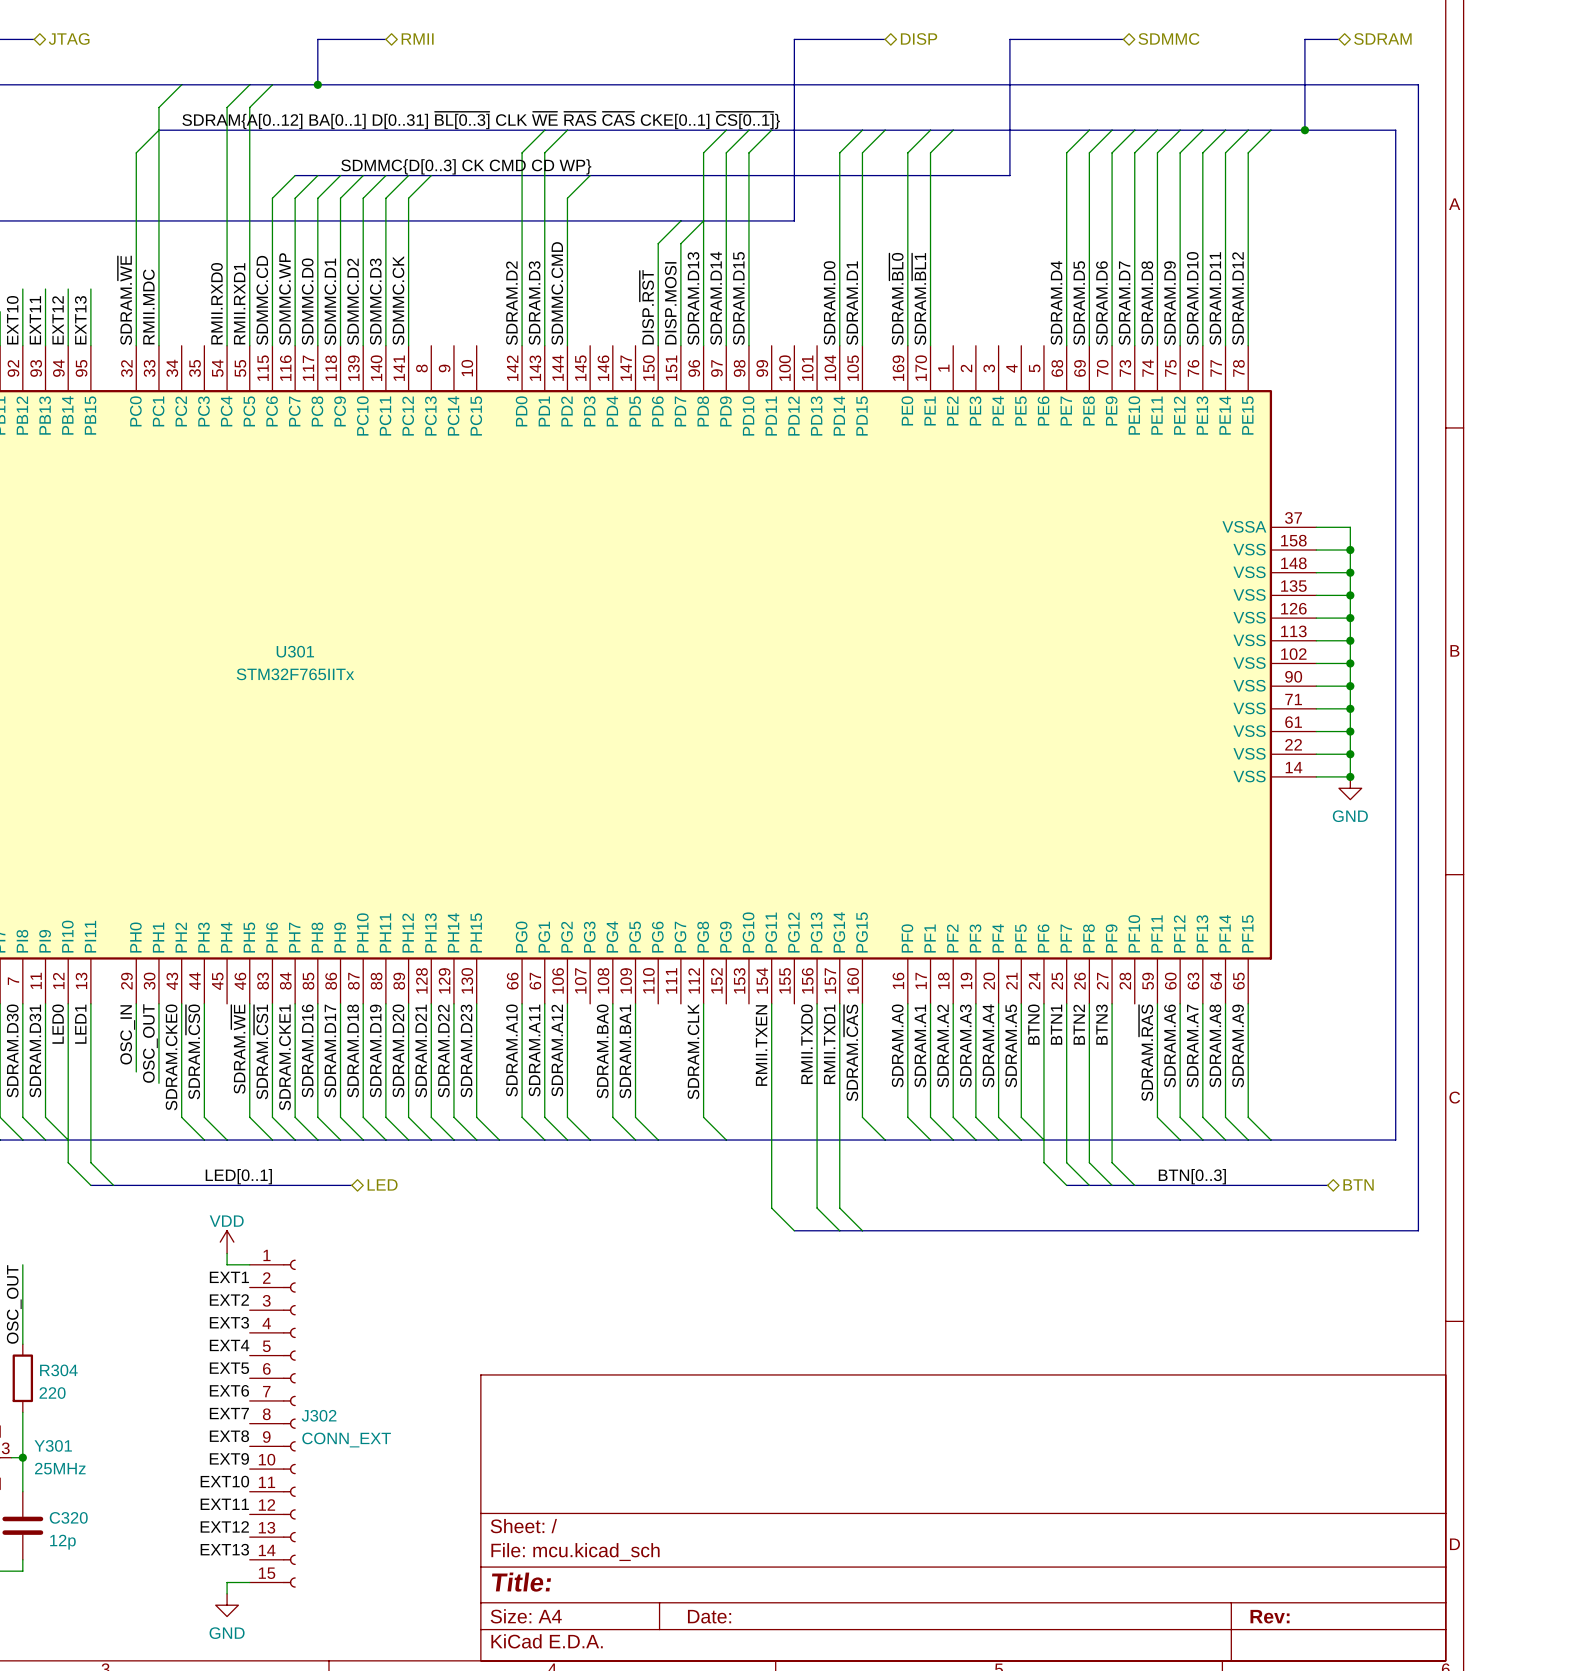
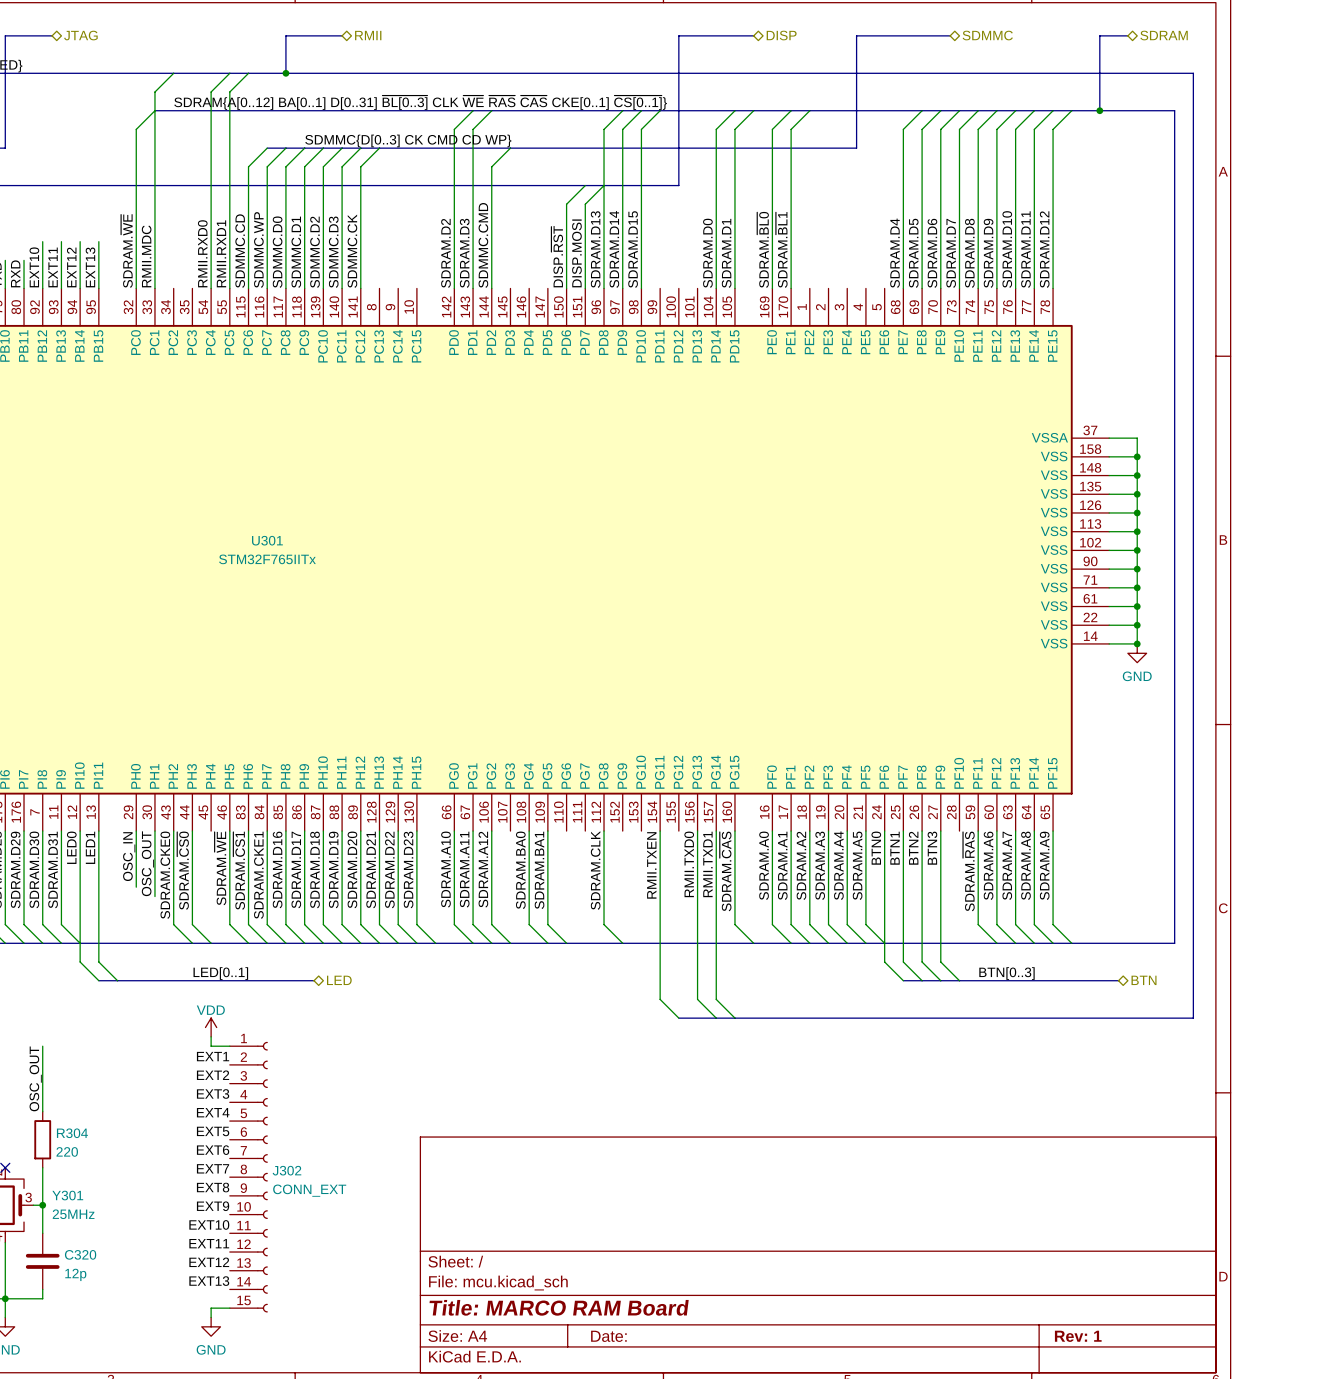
title block: Title: (521, 1582) -> Title: MARCO RAM Board (559, 1307)
title block: Rev: (1270, 1616) -> Rev: 1 (1078, 1336)

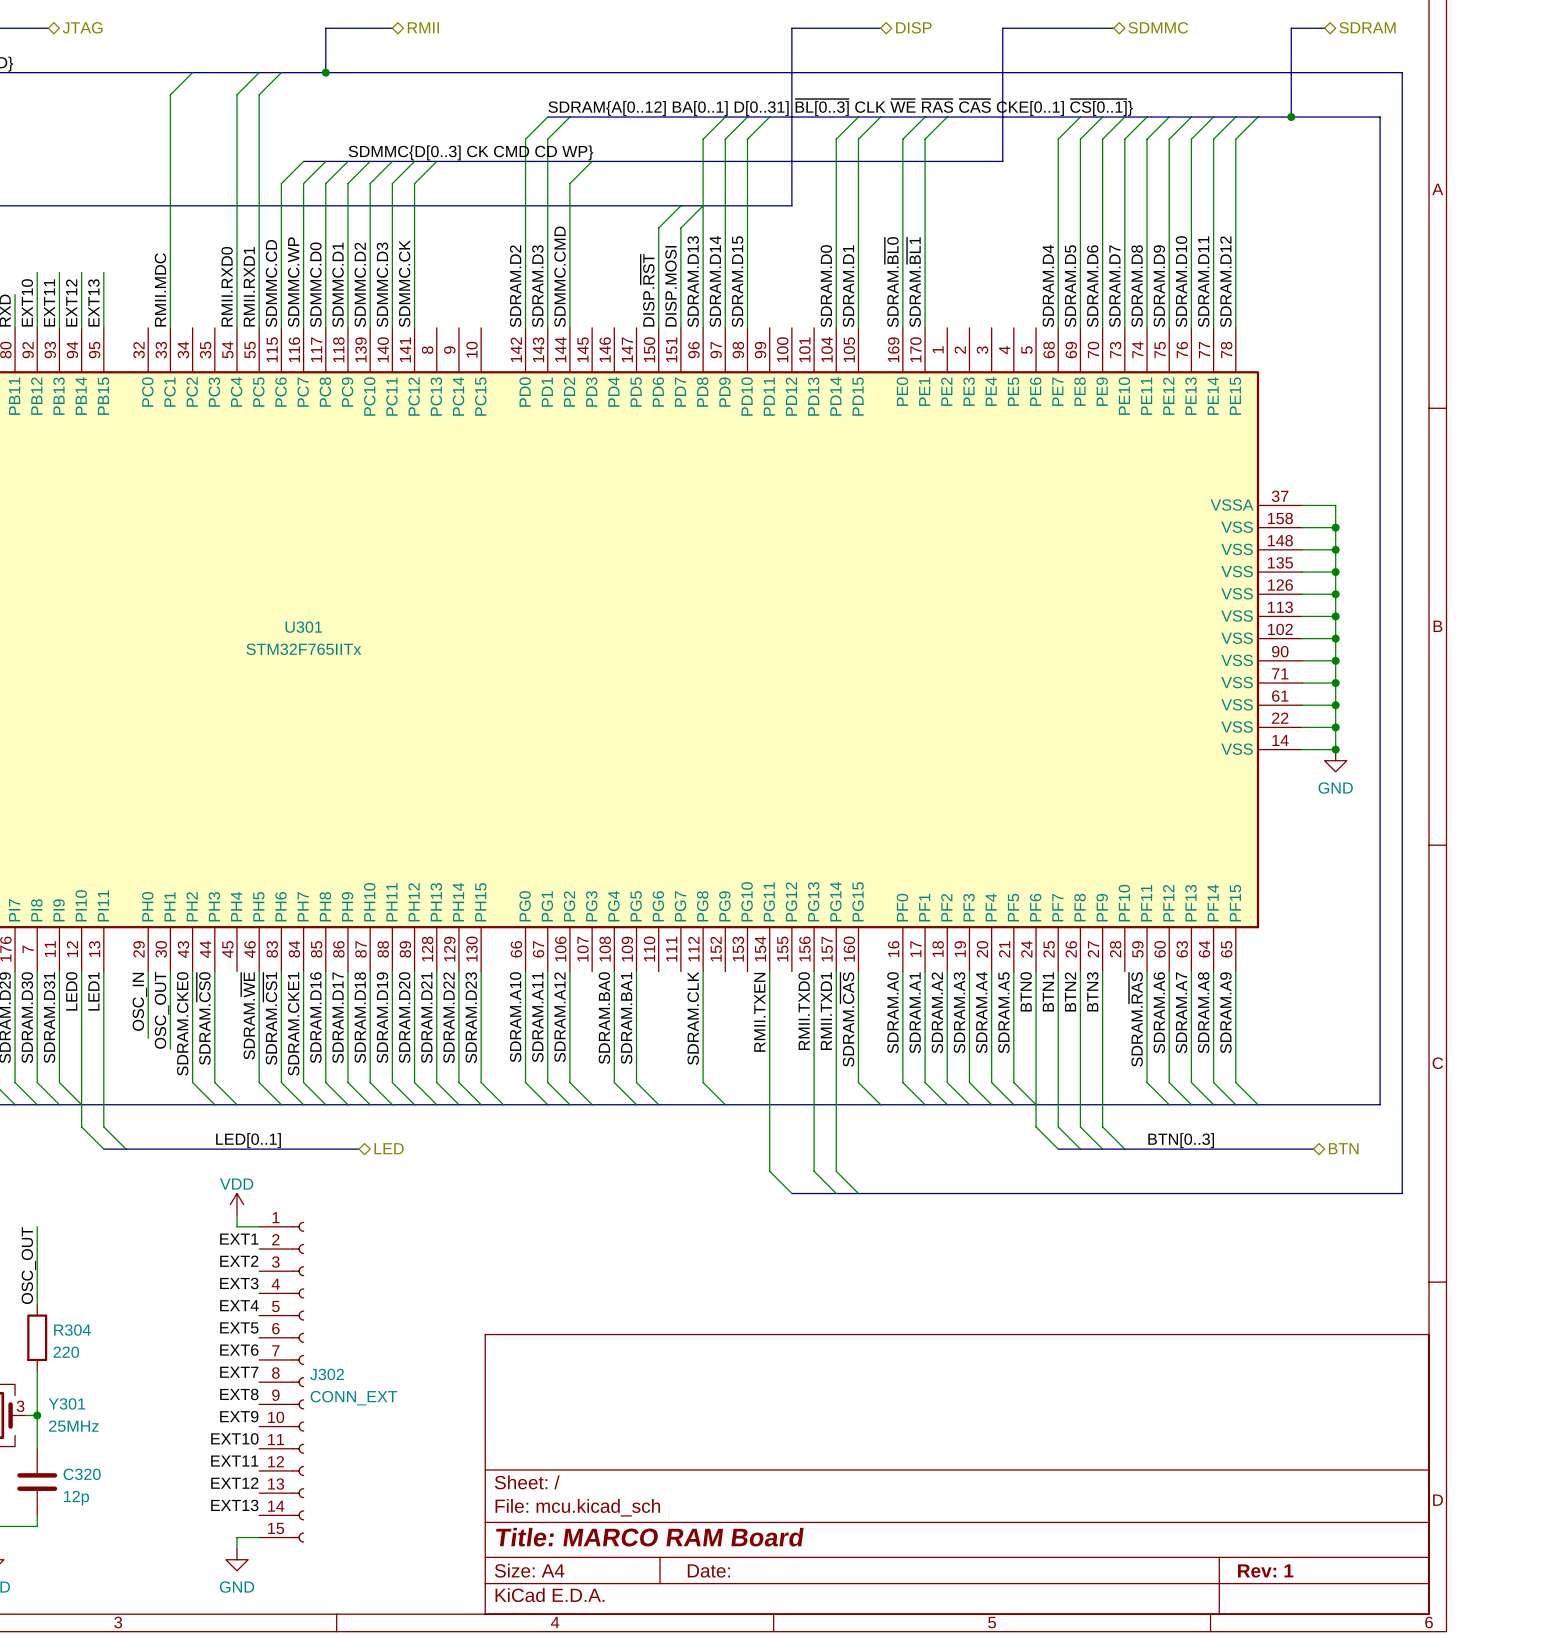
label: SDRAM{A[0..12] BA[0..1] D[0..31] ~{BL[0..3]} CLK ~{WE} ~{RAS} ~{CAS} CKE[0..1] ~{CS[0..1]}} (420, 102) -> none
label: none -> SDRAM{A[0..12] BA[0..1] D[0..31] ~{BL[0..3]} CLK ~{WE} ~{RAS} ~{CAS} CKE[0..1] ~{CS[0..1]}} (840, 107)
wire: (154, 110) (136, 129) (136, 288) -> none
bus: (154, 110) (473, 110) -> none
label: SDRAM.~{WE} (126, 251) -> none

